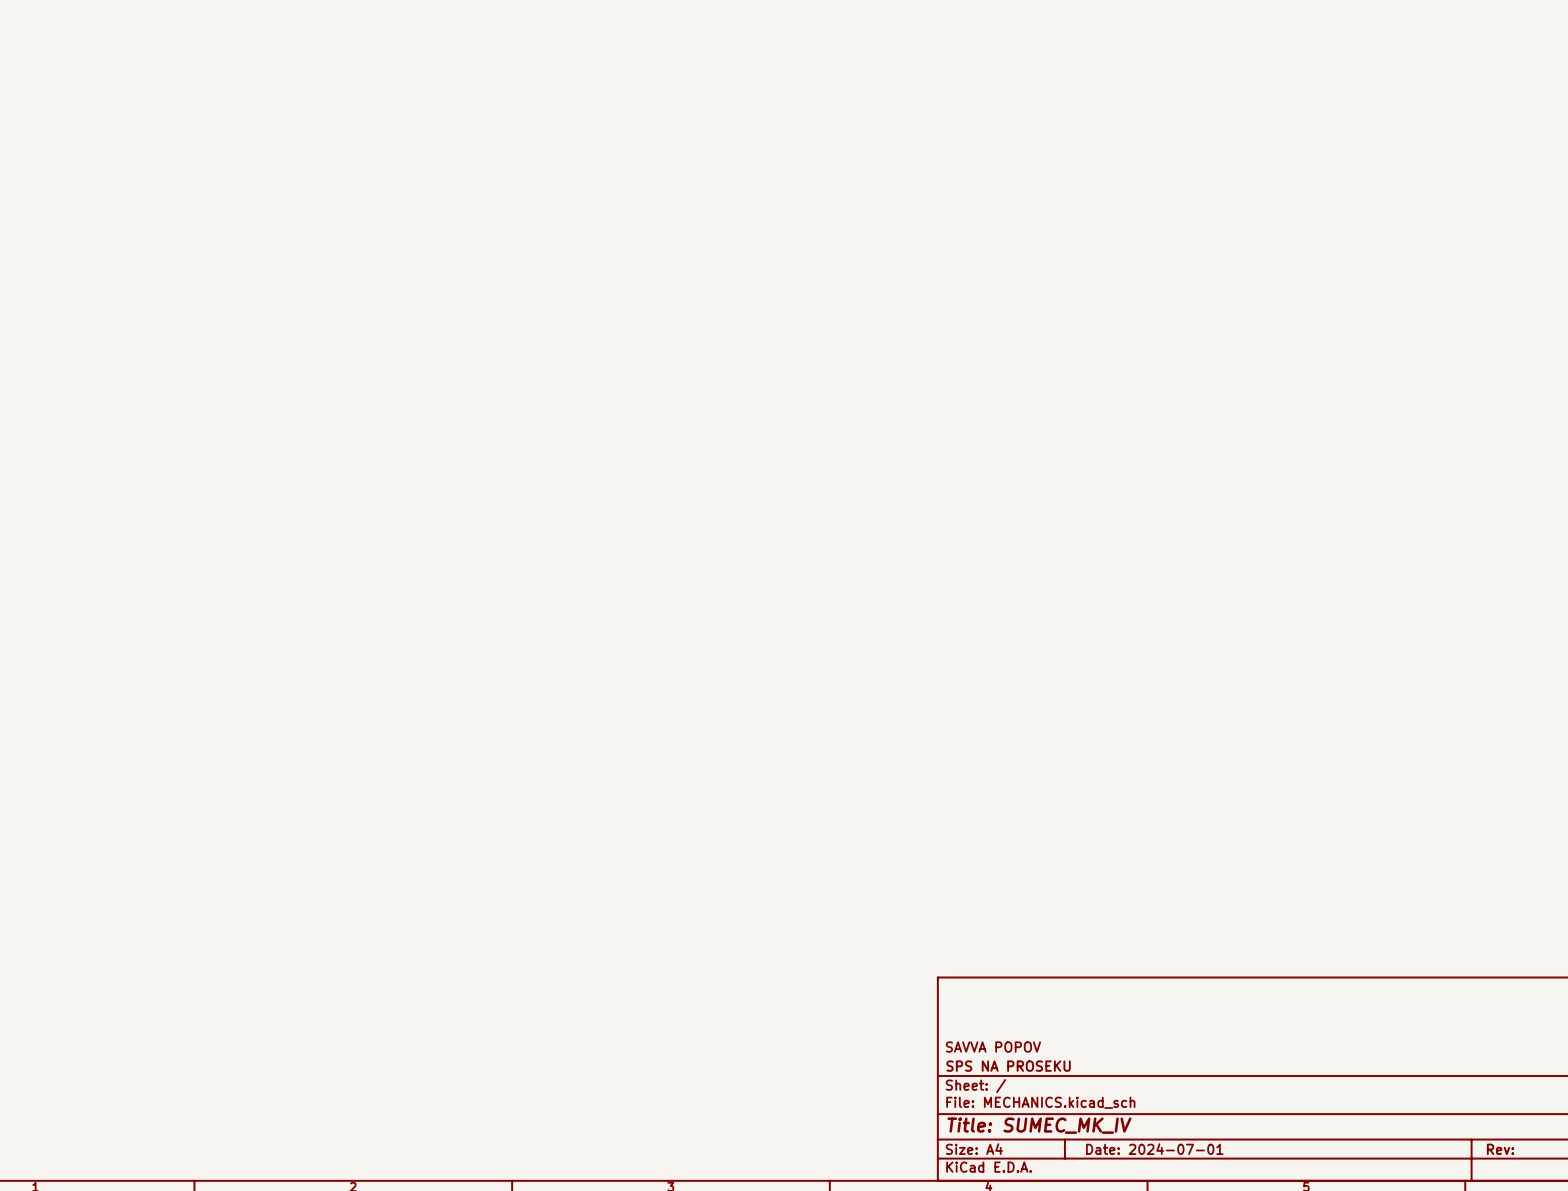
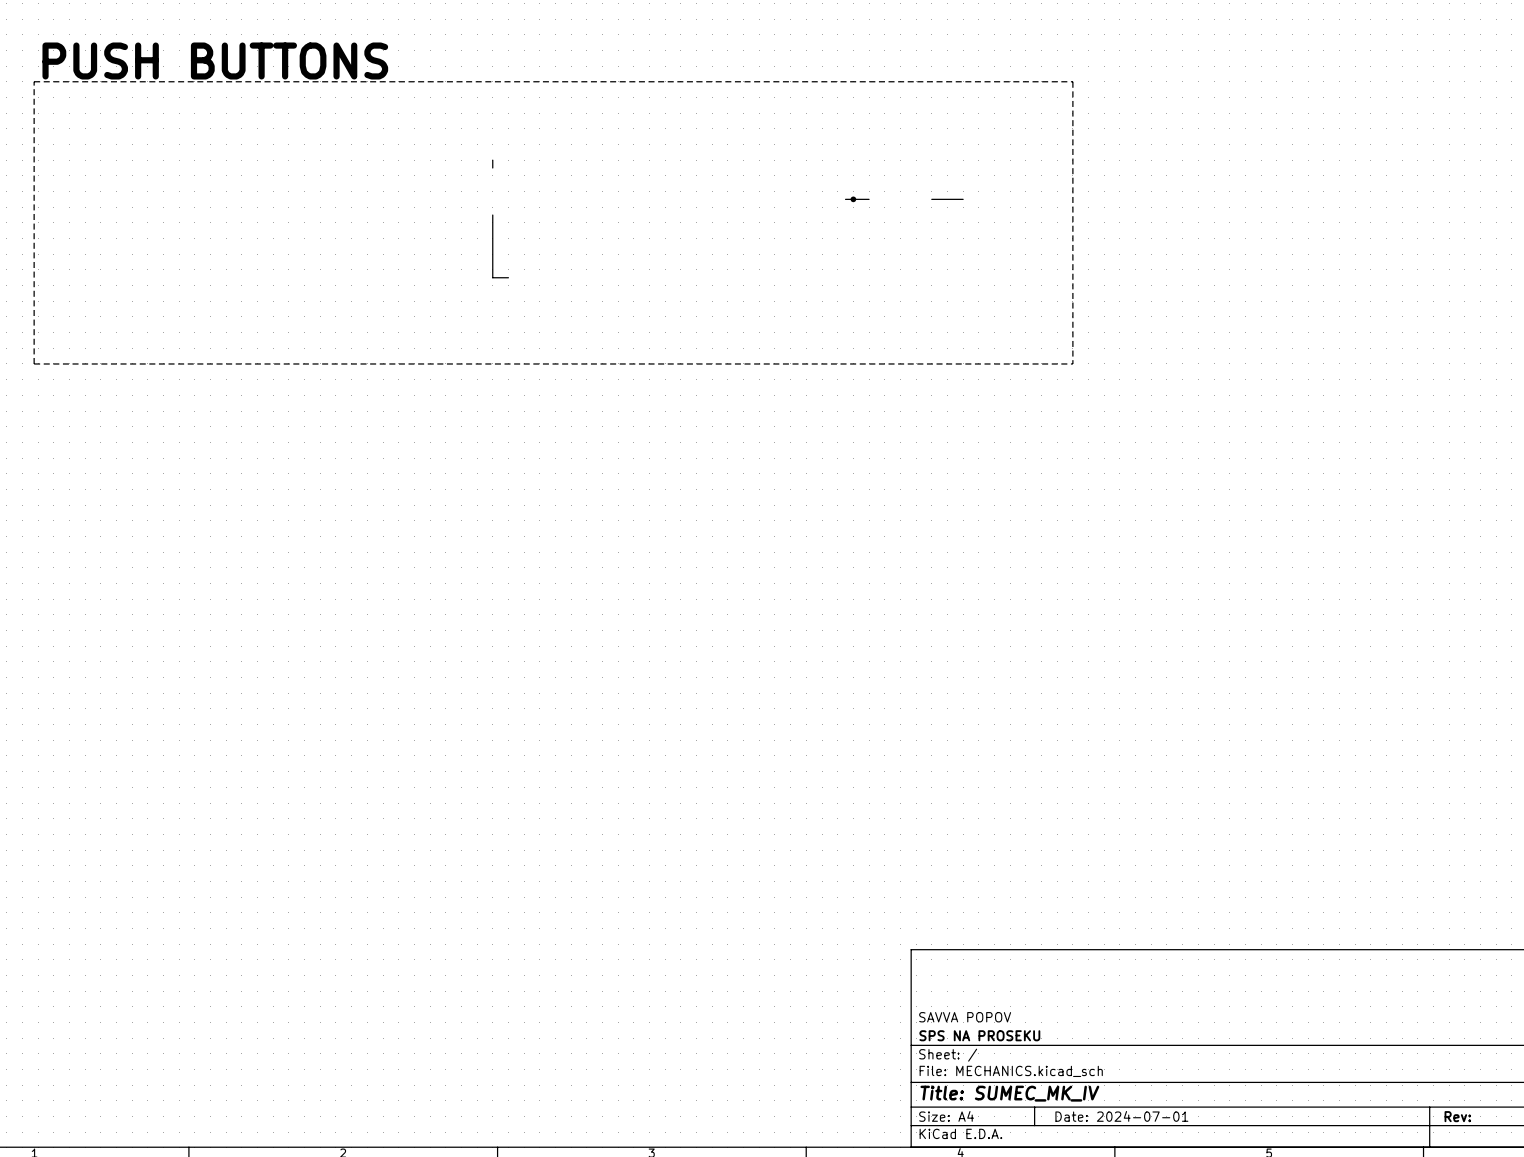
text: none -> PUSH BUTTONS (215, 61)
line: none -> (34, 81) (1072, 81) (1072, 363) (34, 363) (34, 81)
wire: none -> (492, 160) (492, 167)
wire: none -> (845, 199) (869, 199)
junction: none -> (853, 199)
wire: none -> (931, 199) (963, 199)
wire: none -> (492, 215) (492, 277) (508, 277)

